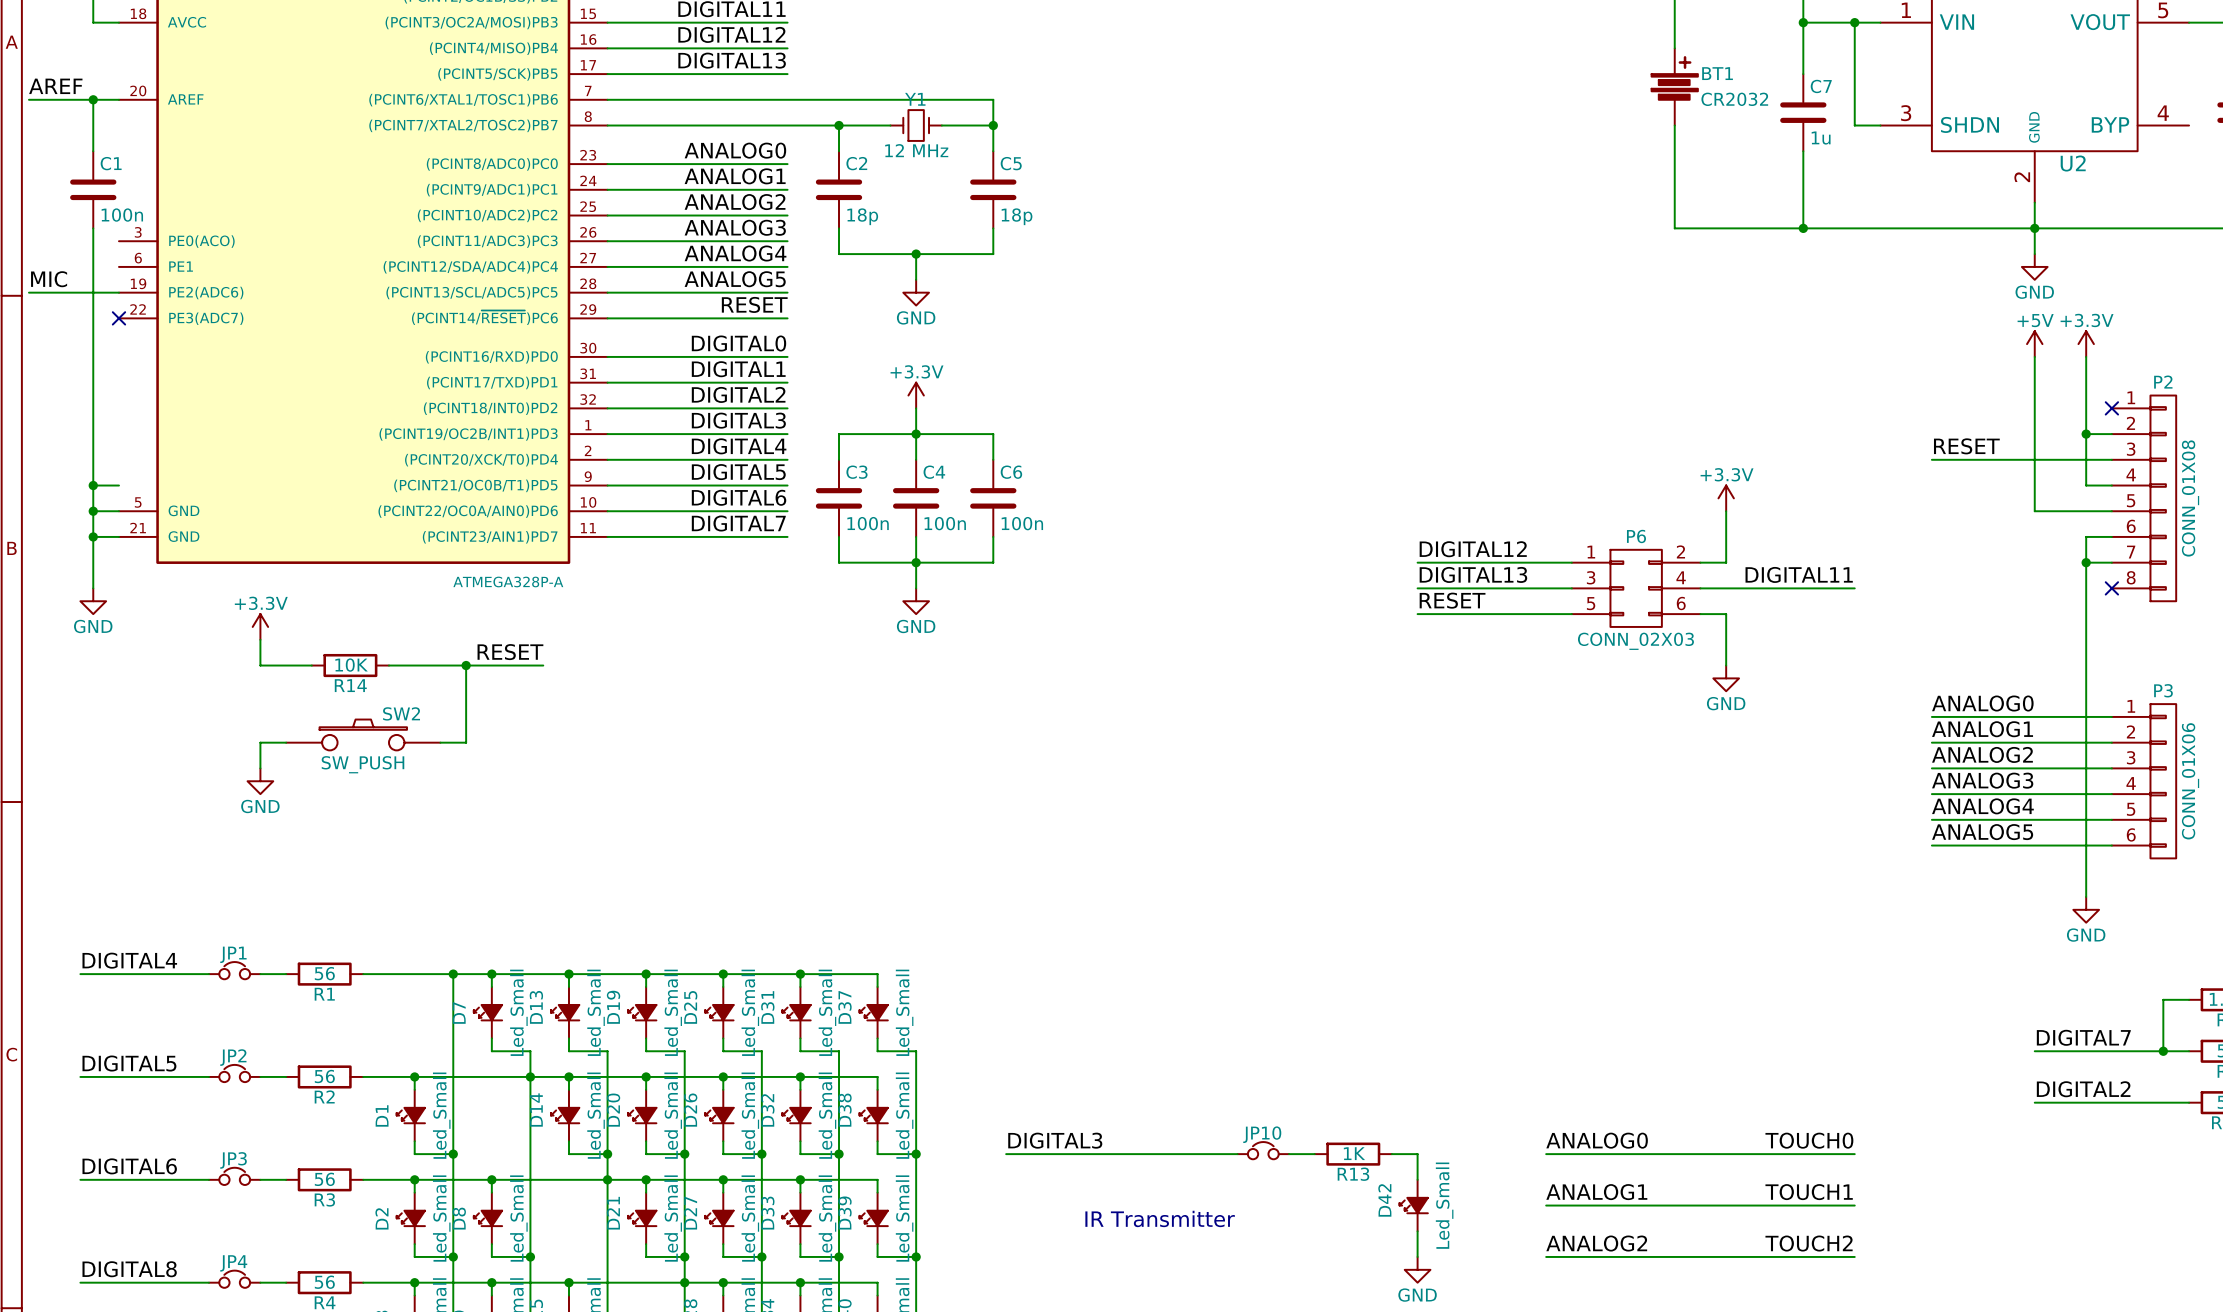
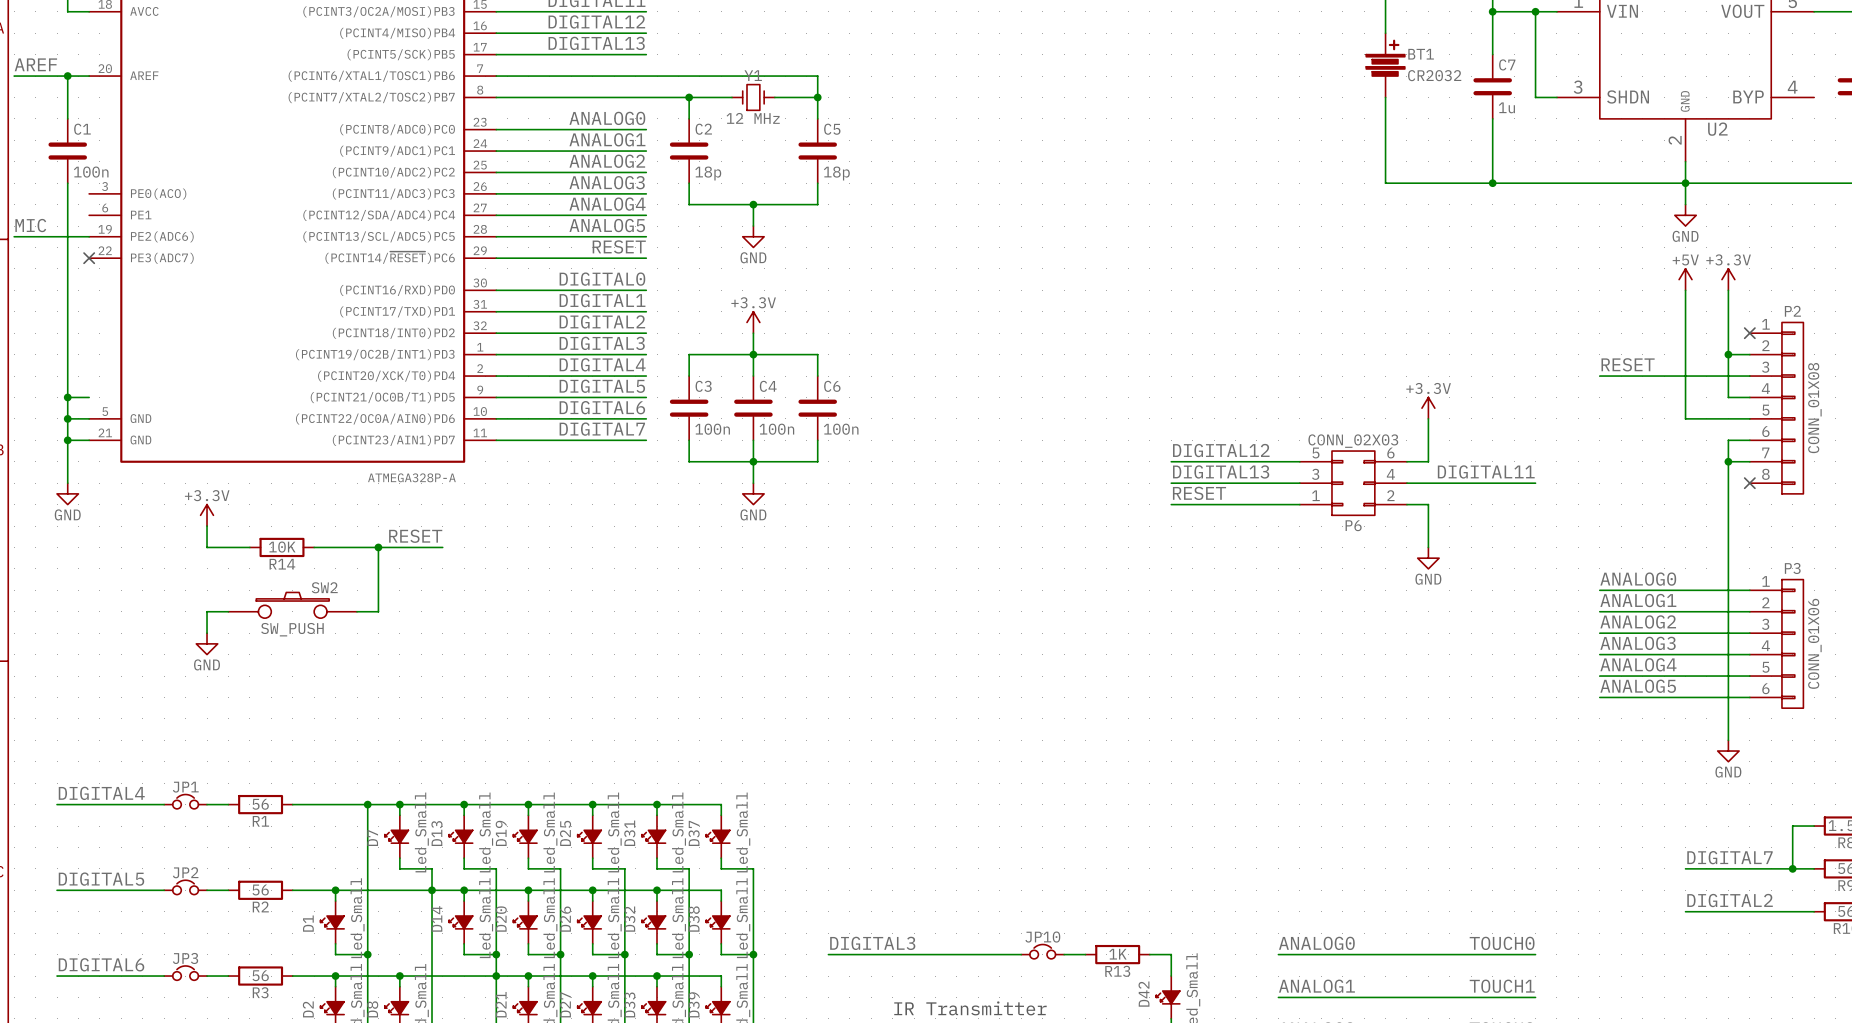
P6 flip: as is (1636, 588) -> up-down (1353, 483)

